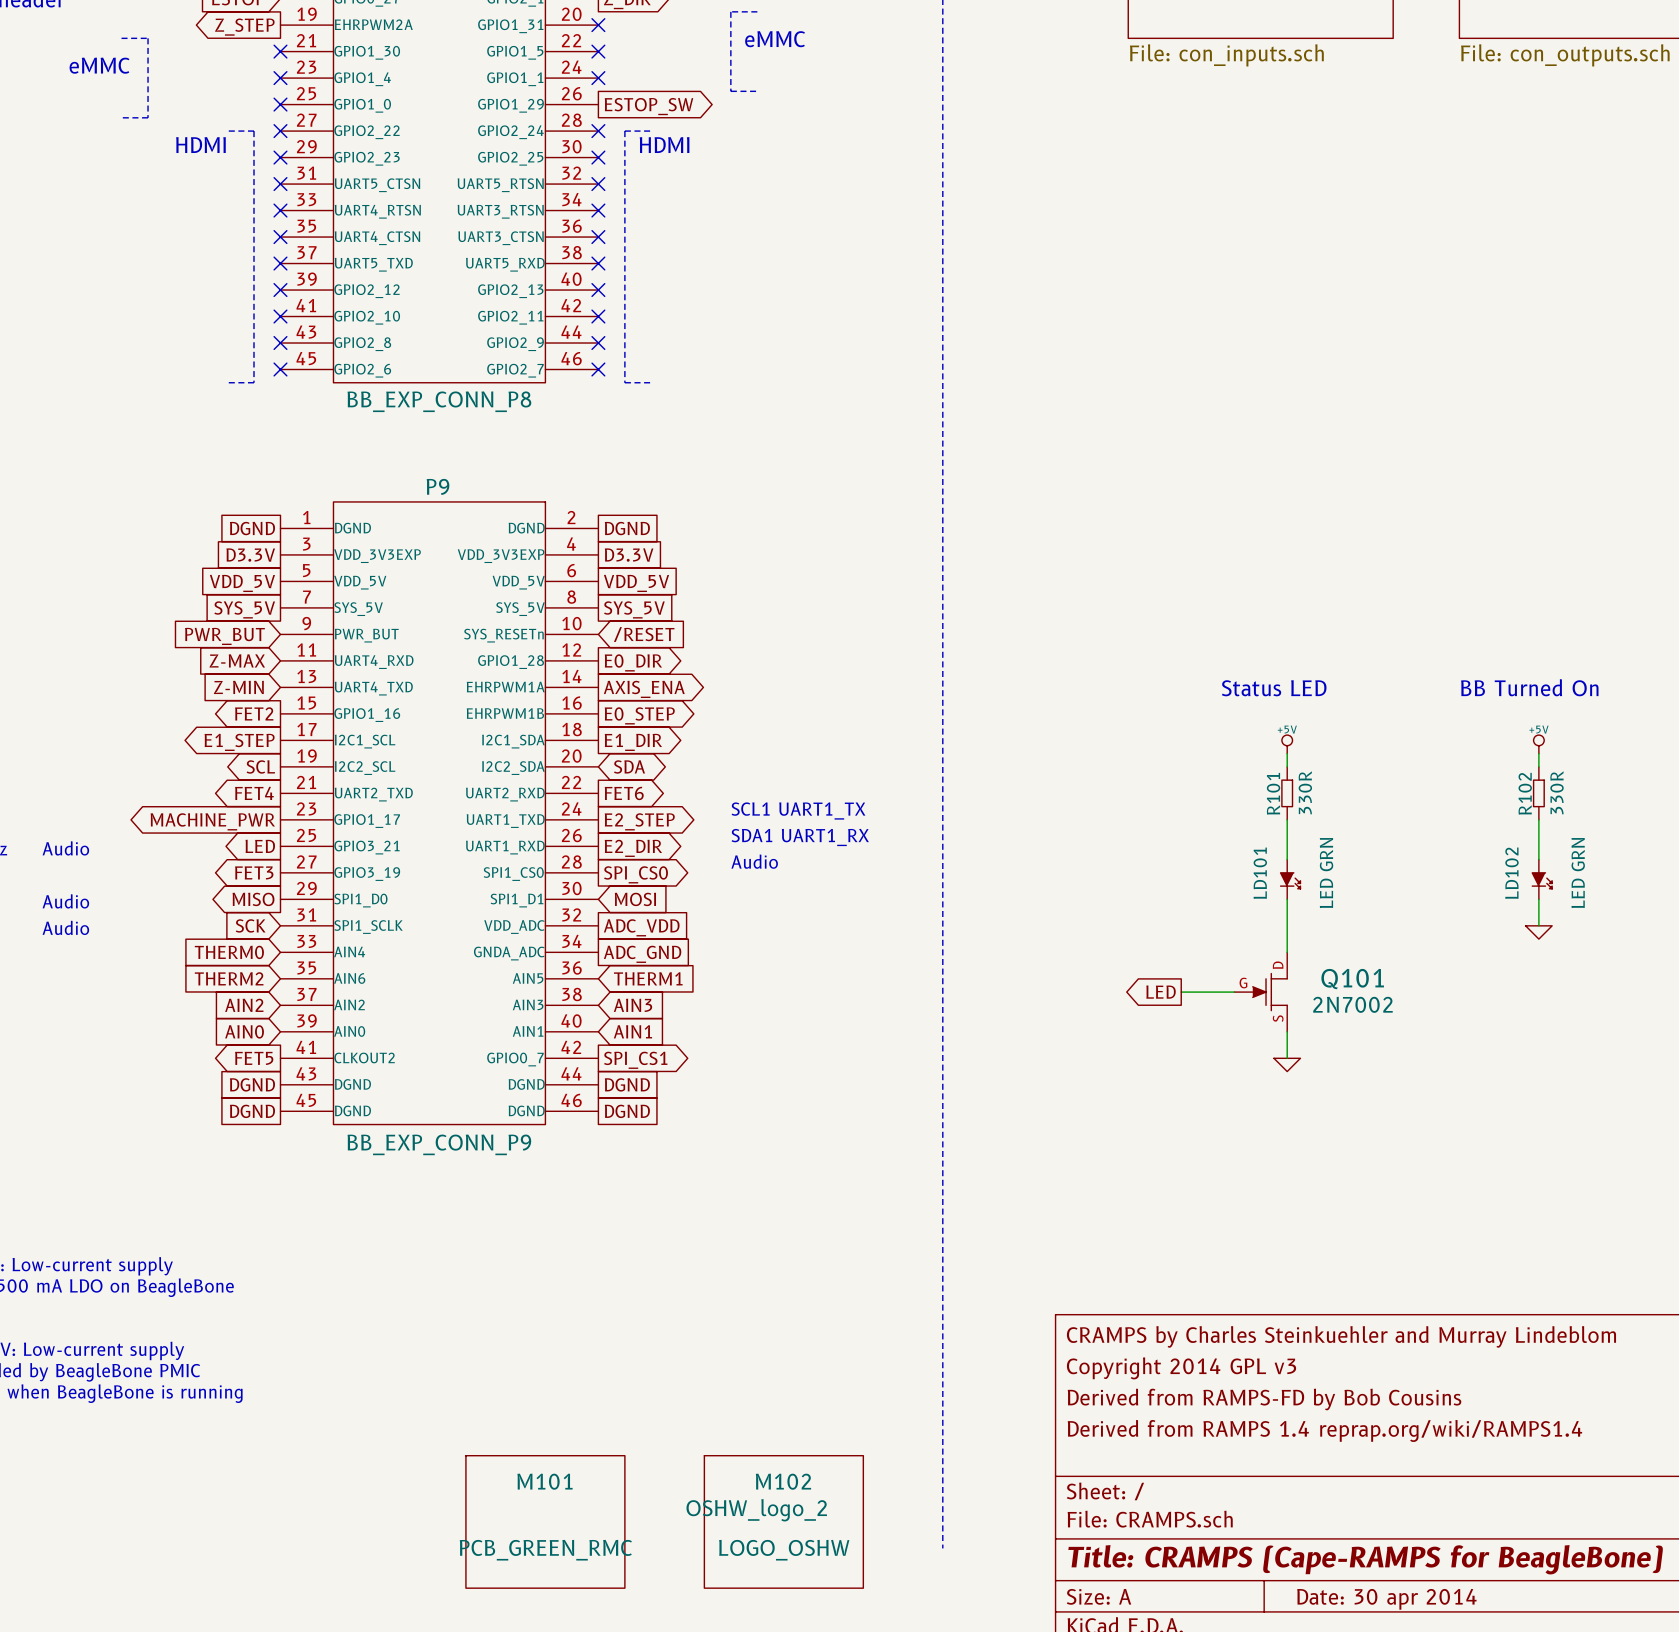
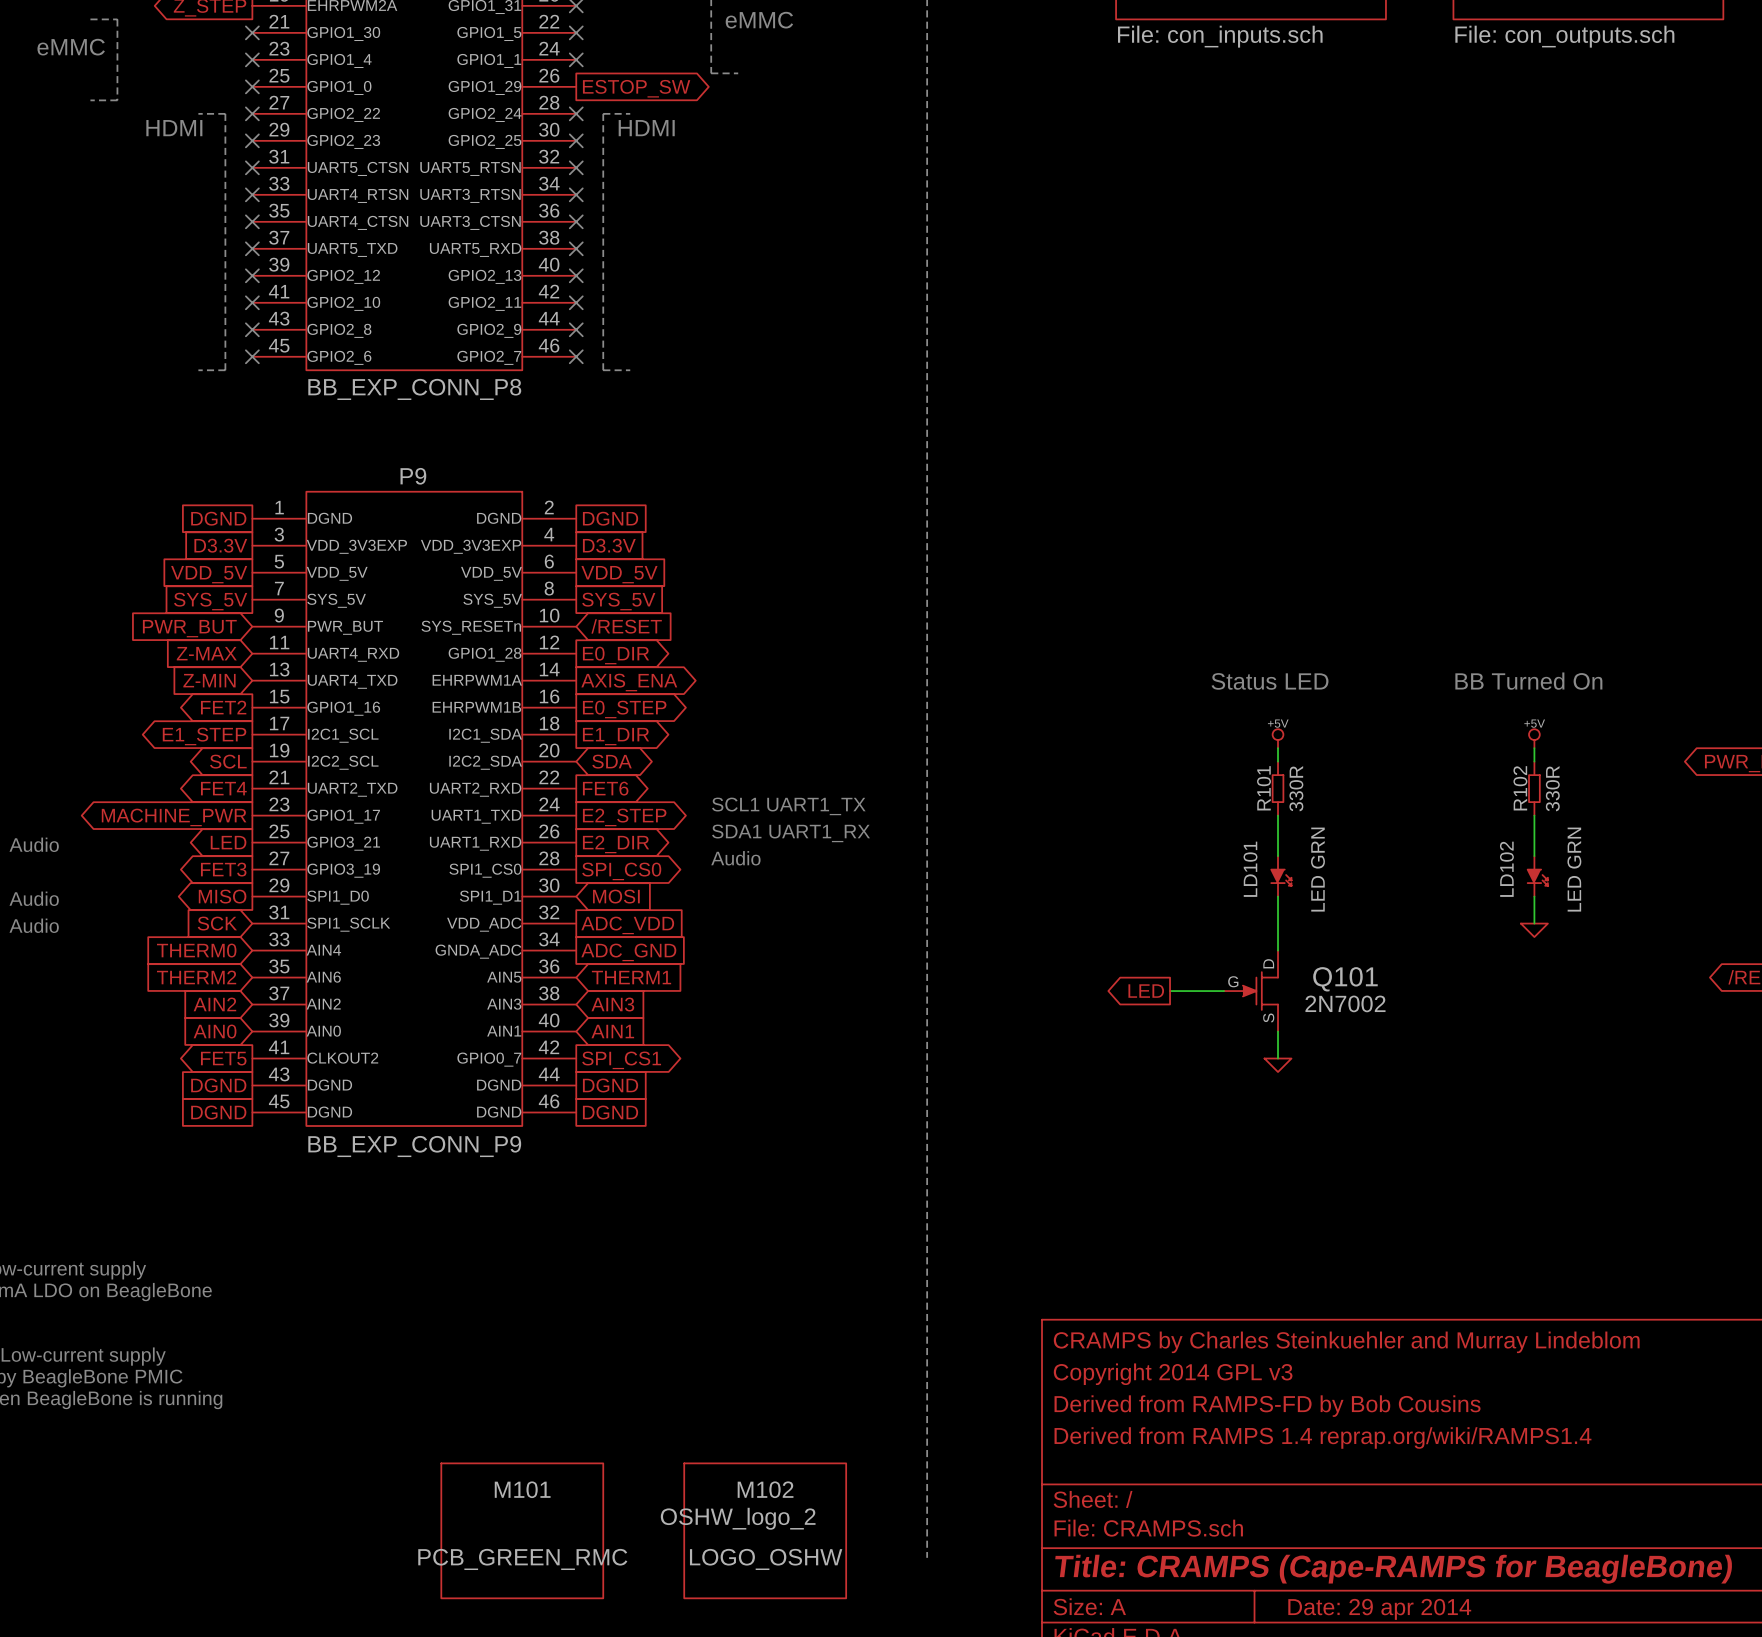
title block: Date: 30 apr 2014 (1386, 1599) -> Date: 29 apr 2014 (1379, 1609)

